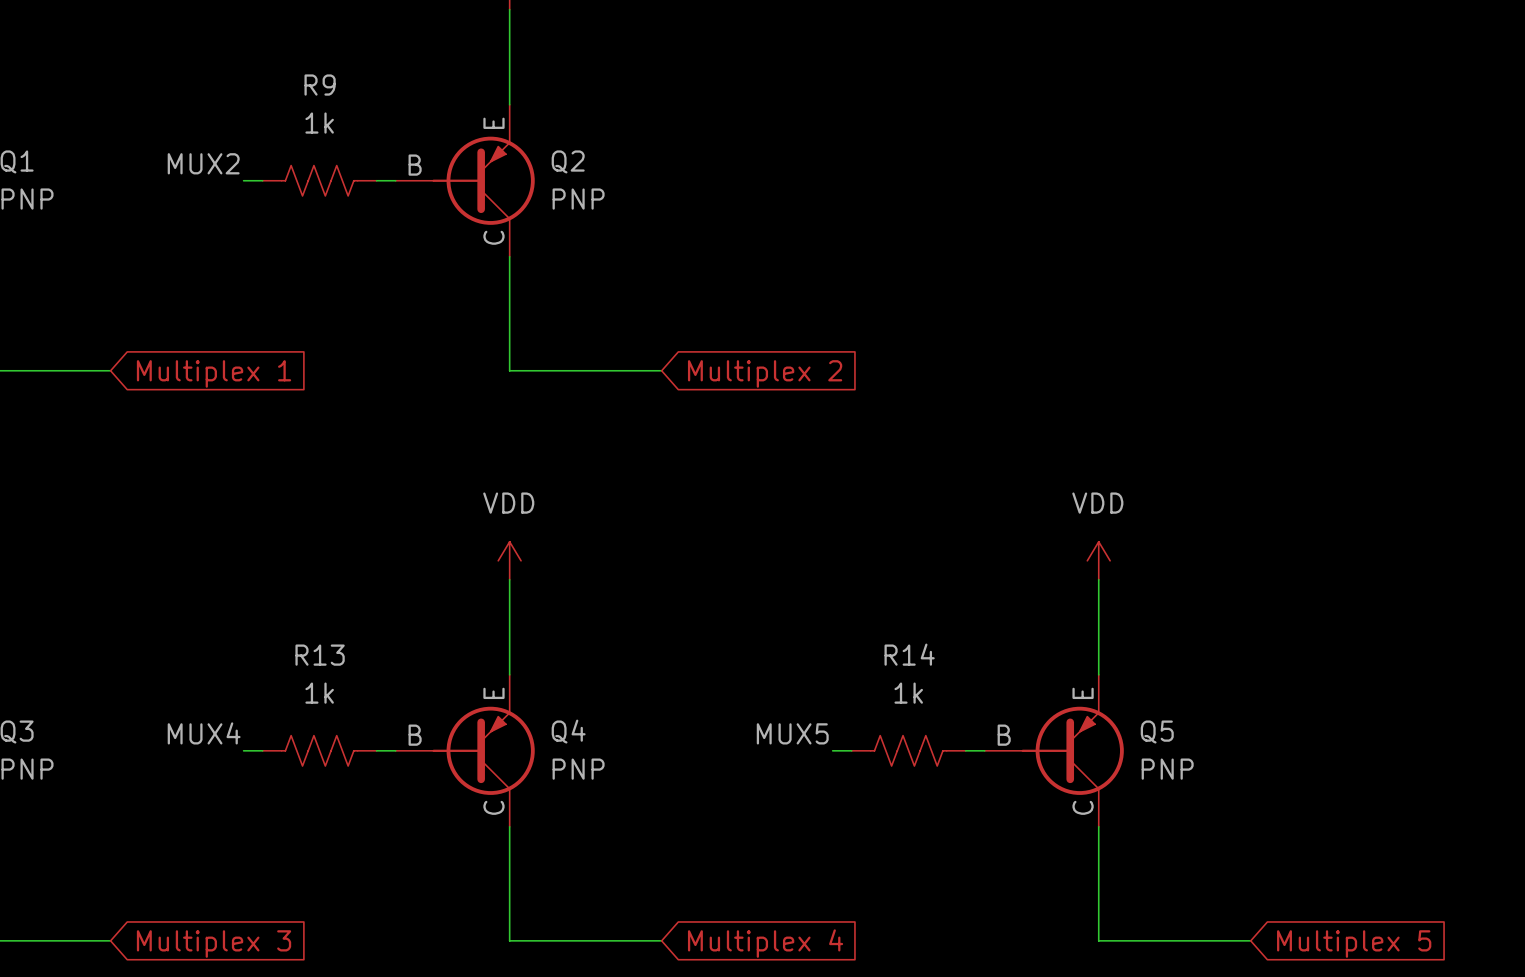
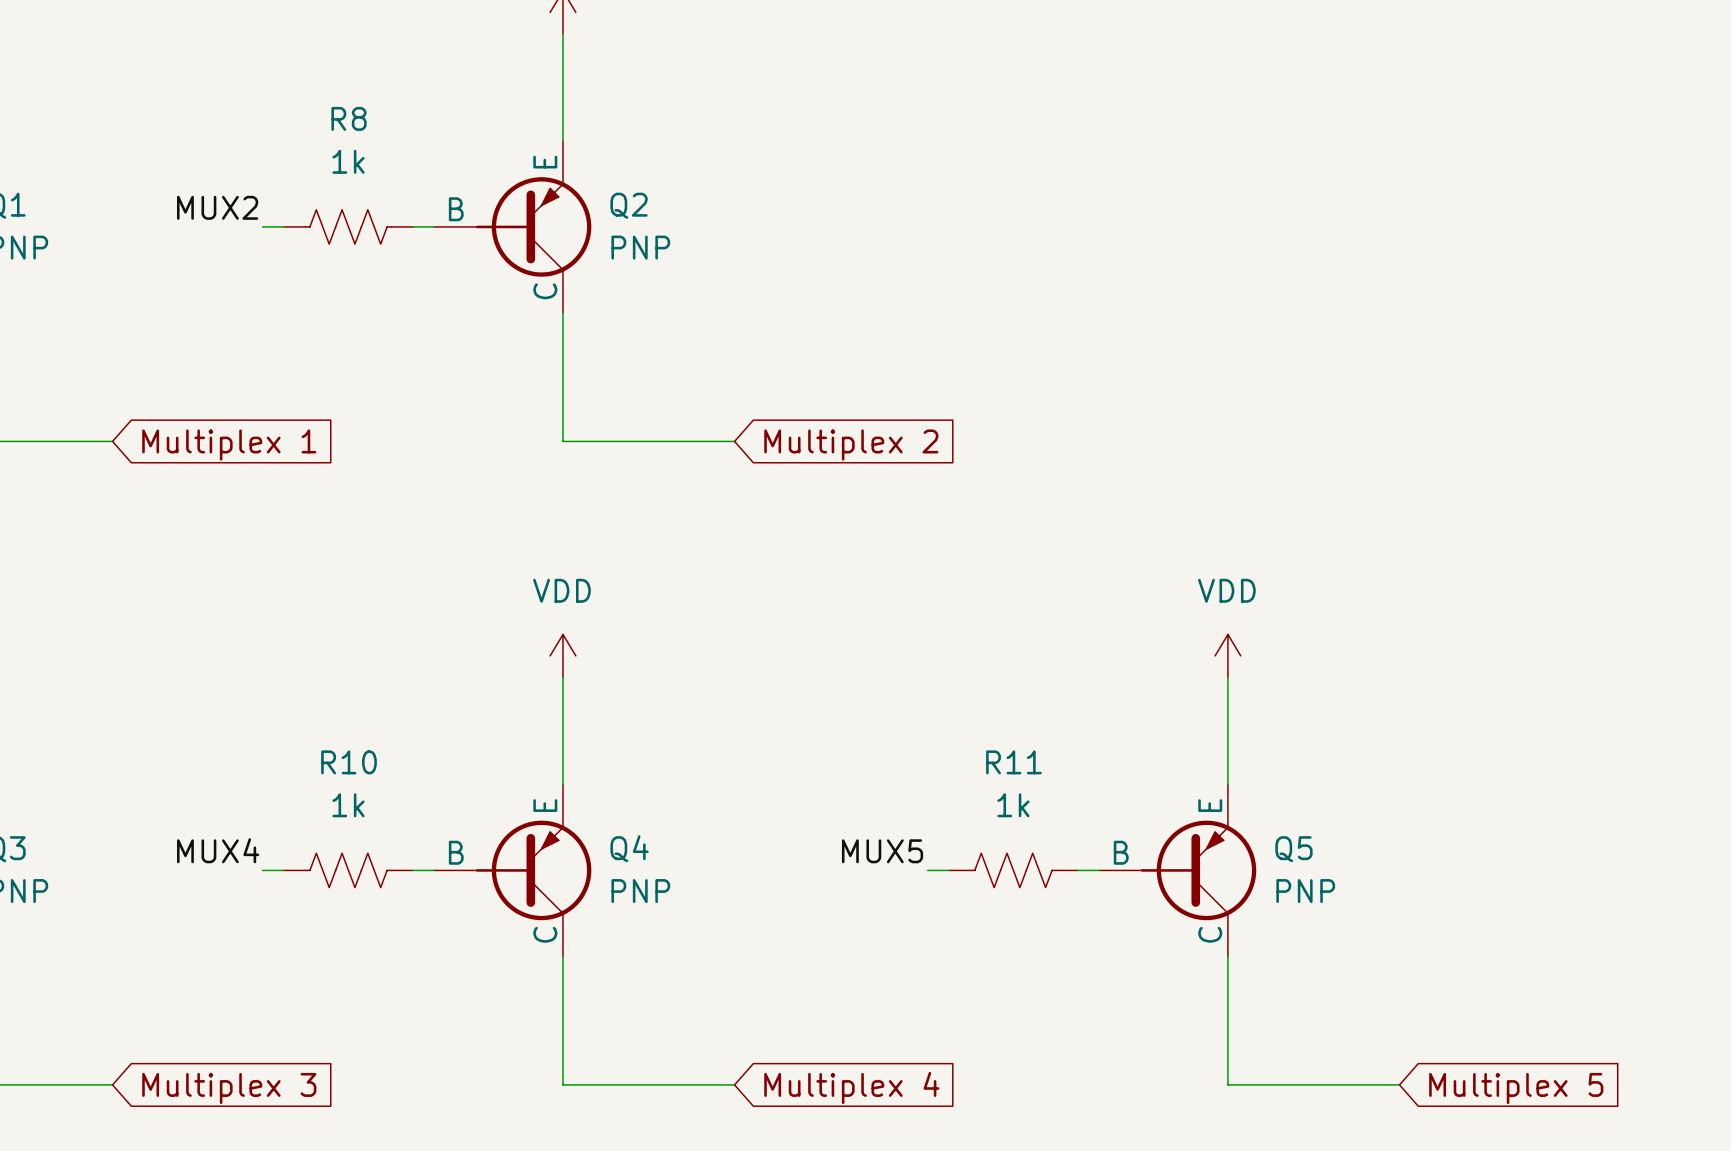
R9 name: R9 (320, 85) -> R8 (349, 118)
R14 name: R14 (909, 654) -> R11 (1013, 762)
R13 name: R13 (320, 655) -> R10 (349, 762)

